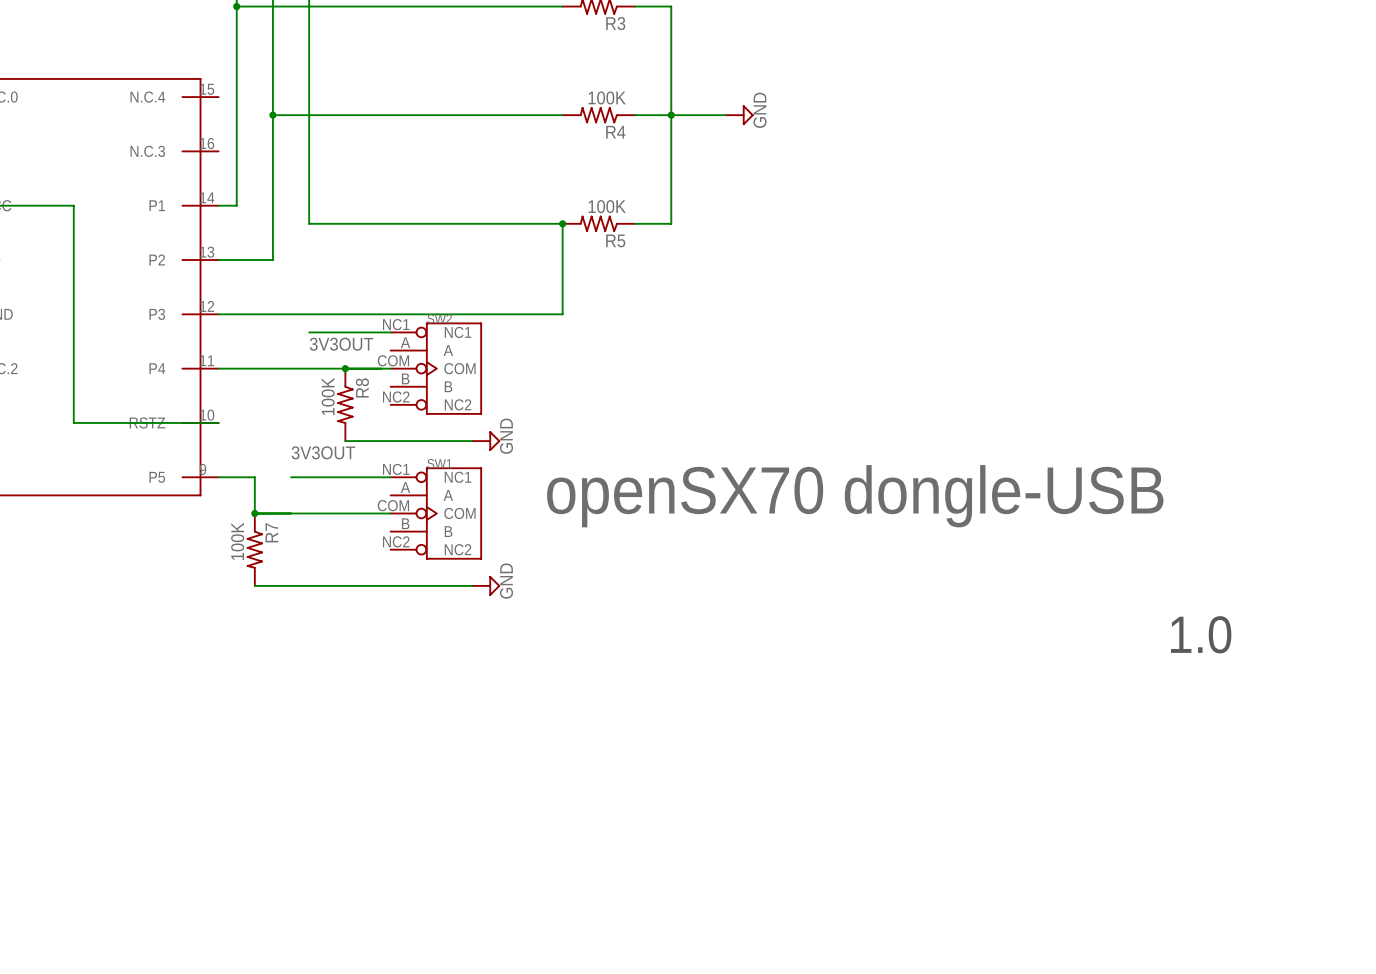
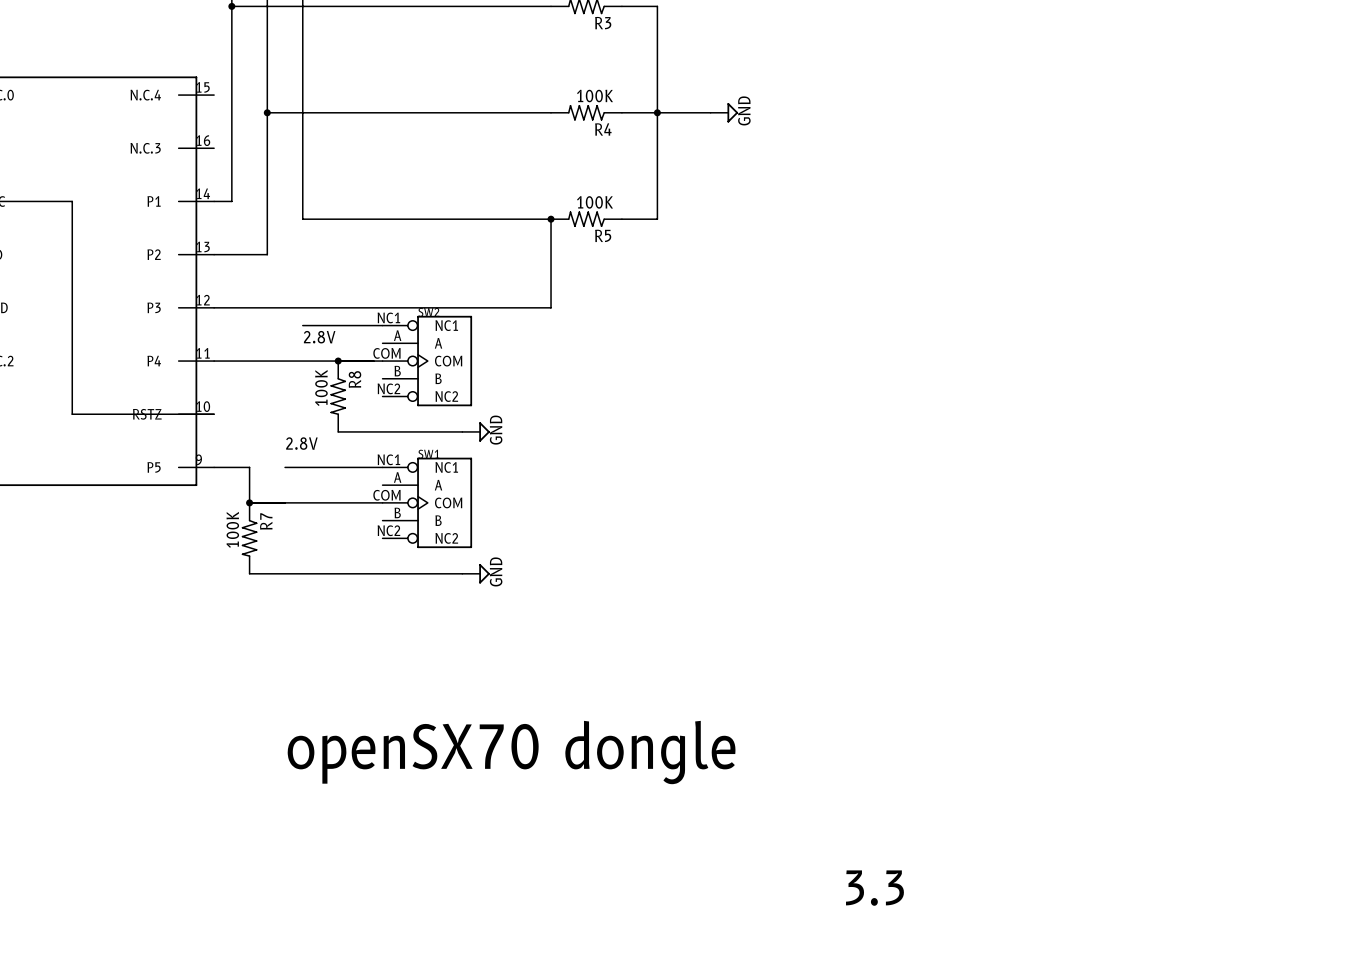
label: 3V3OUT (341, 344) -> 2.8V (319, 337)
label: 3V3OUT (323, 452) -> 2.8V (301, 443)
text: openSX70 dongle-USB (855, 496) -> none
text: 1.0 (1201, 634) -> none
text: none -> openSX70 dongle (511, 752)
text: none -> 3.3 (874, 888)

